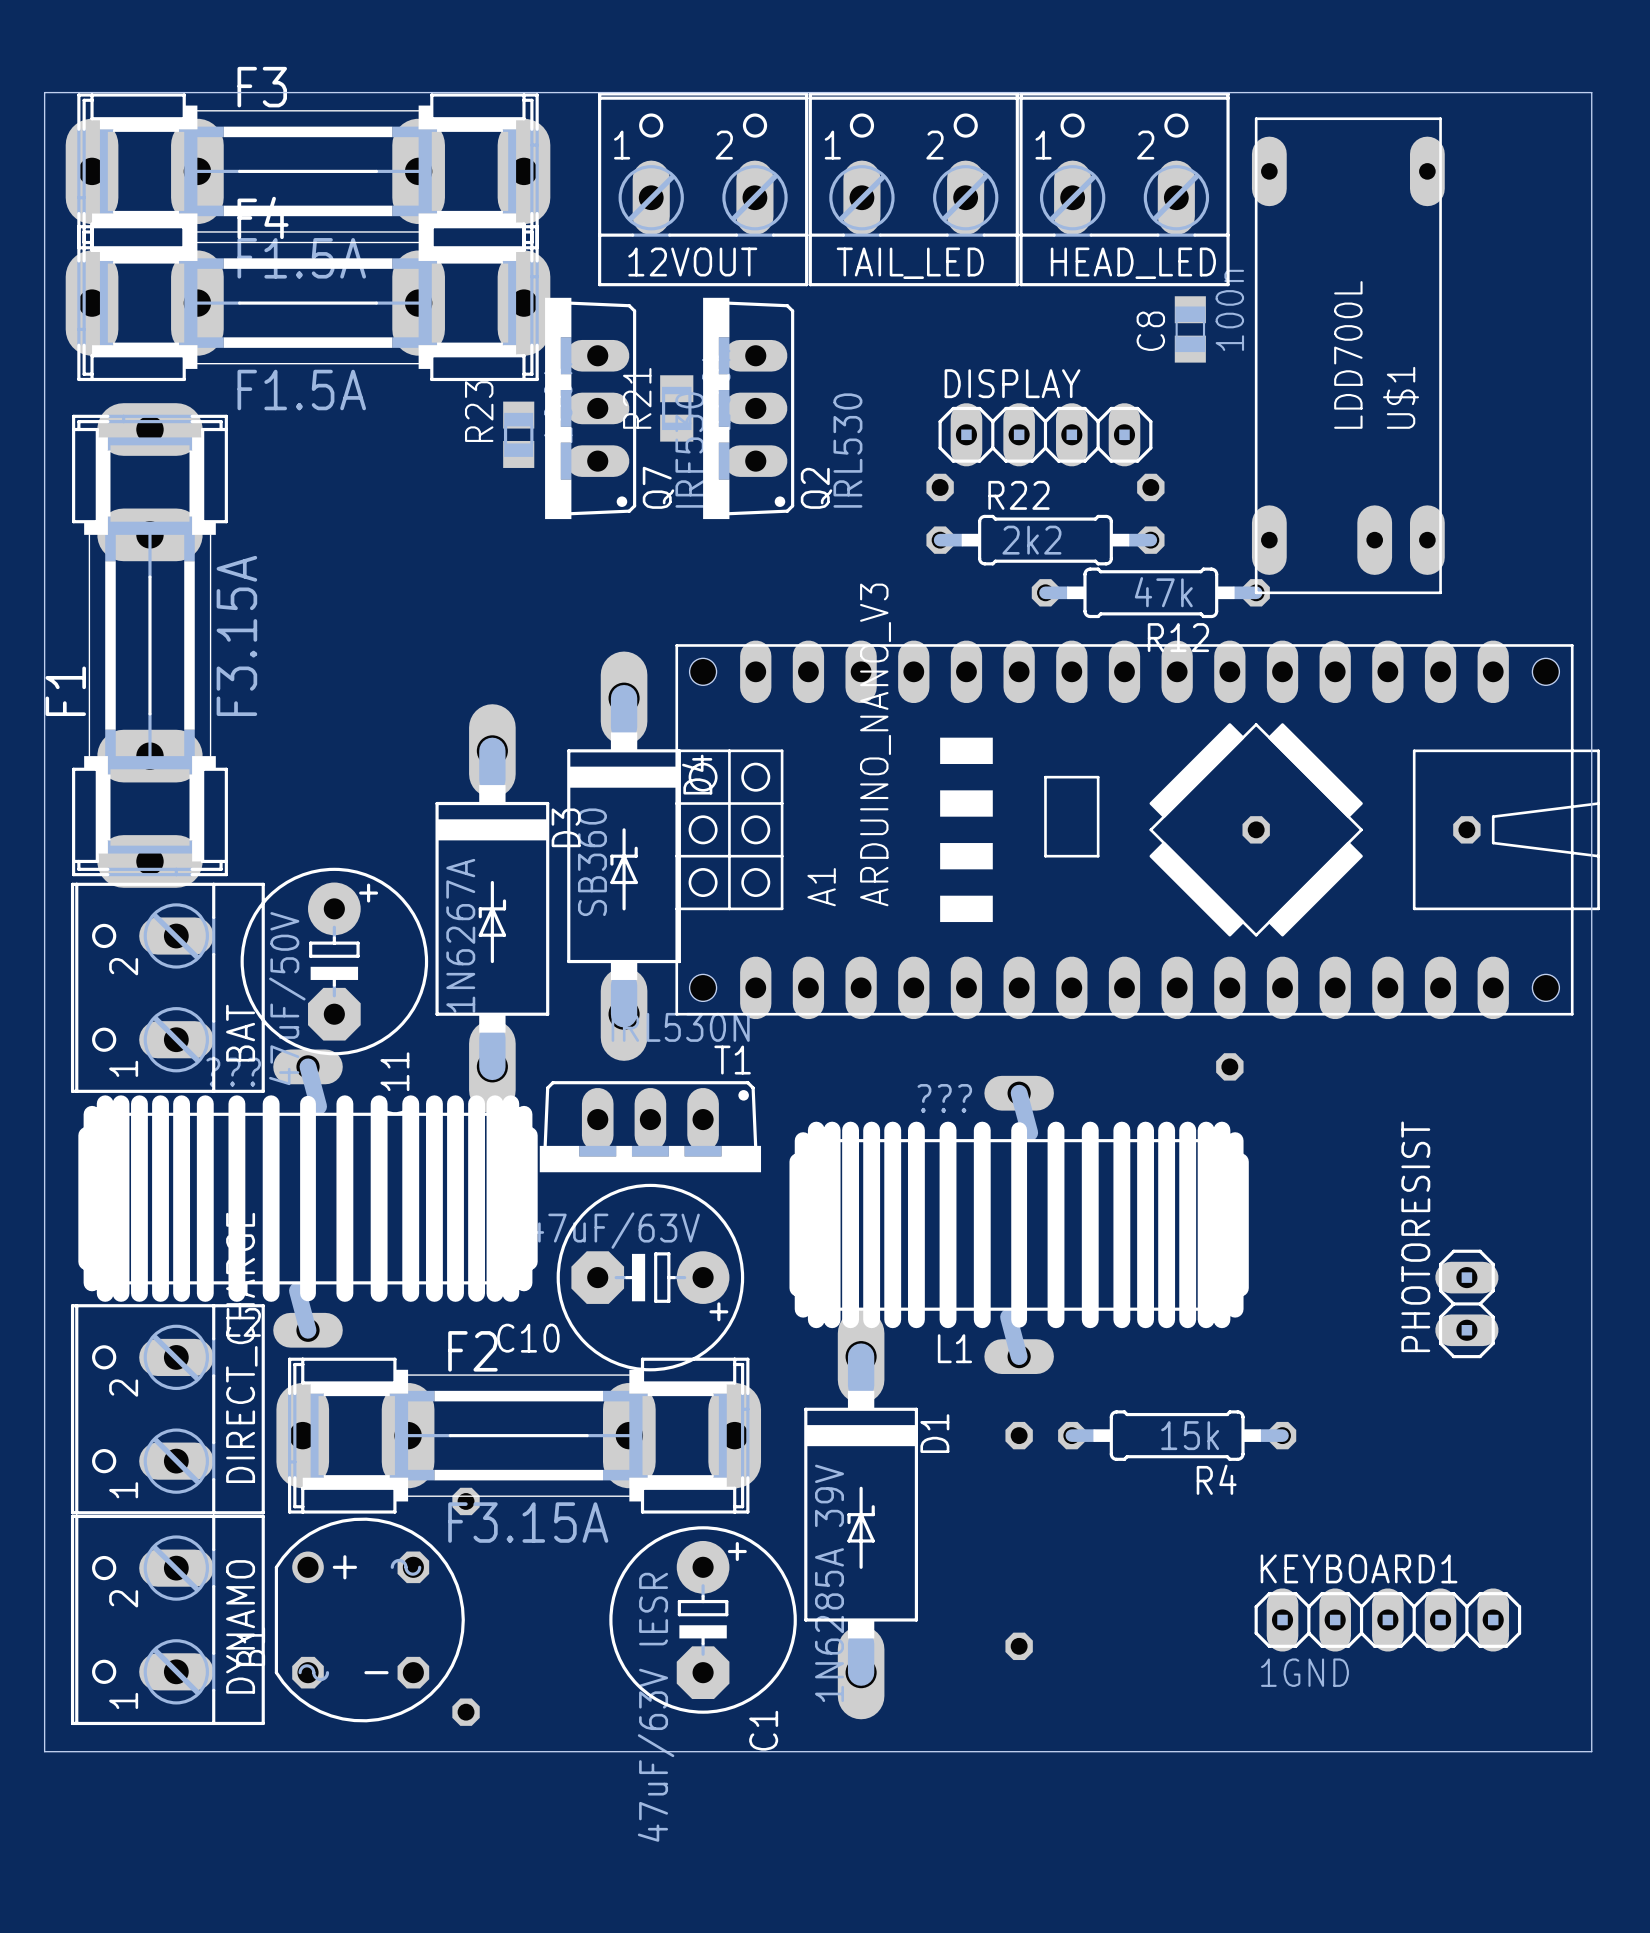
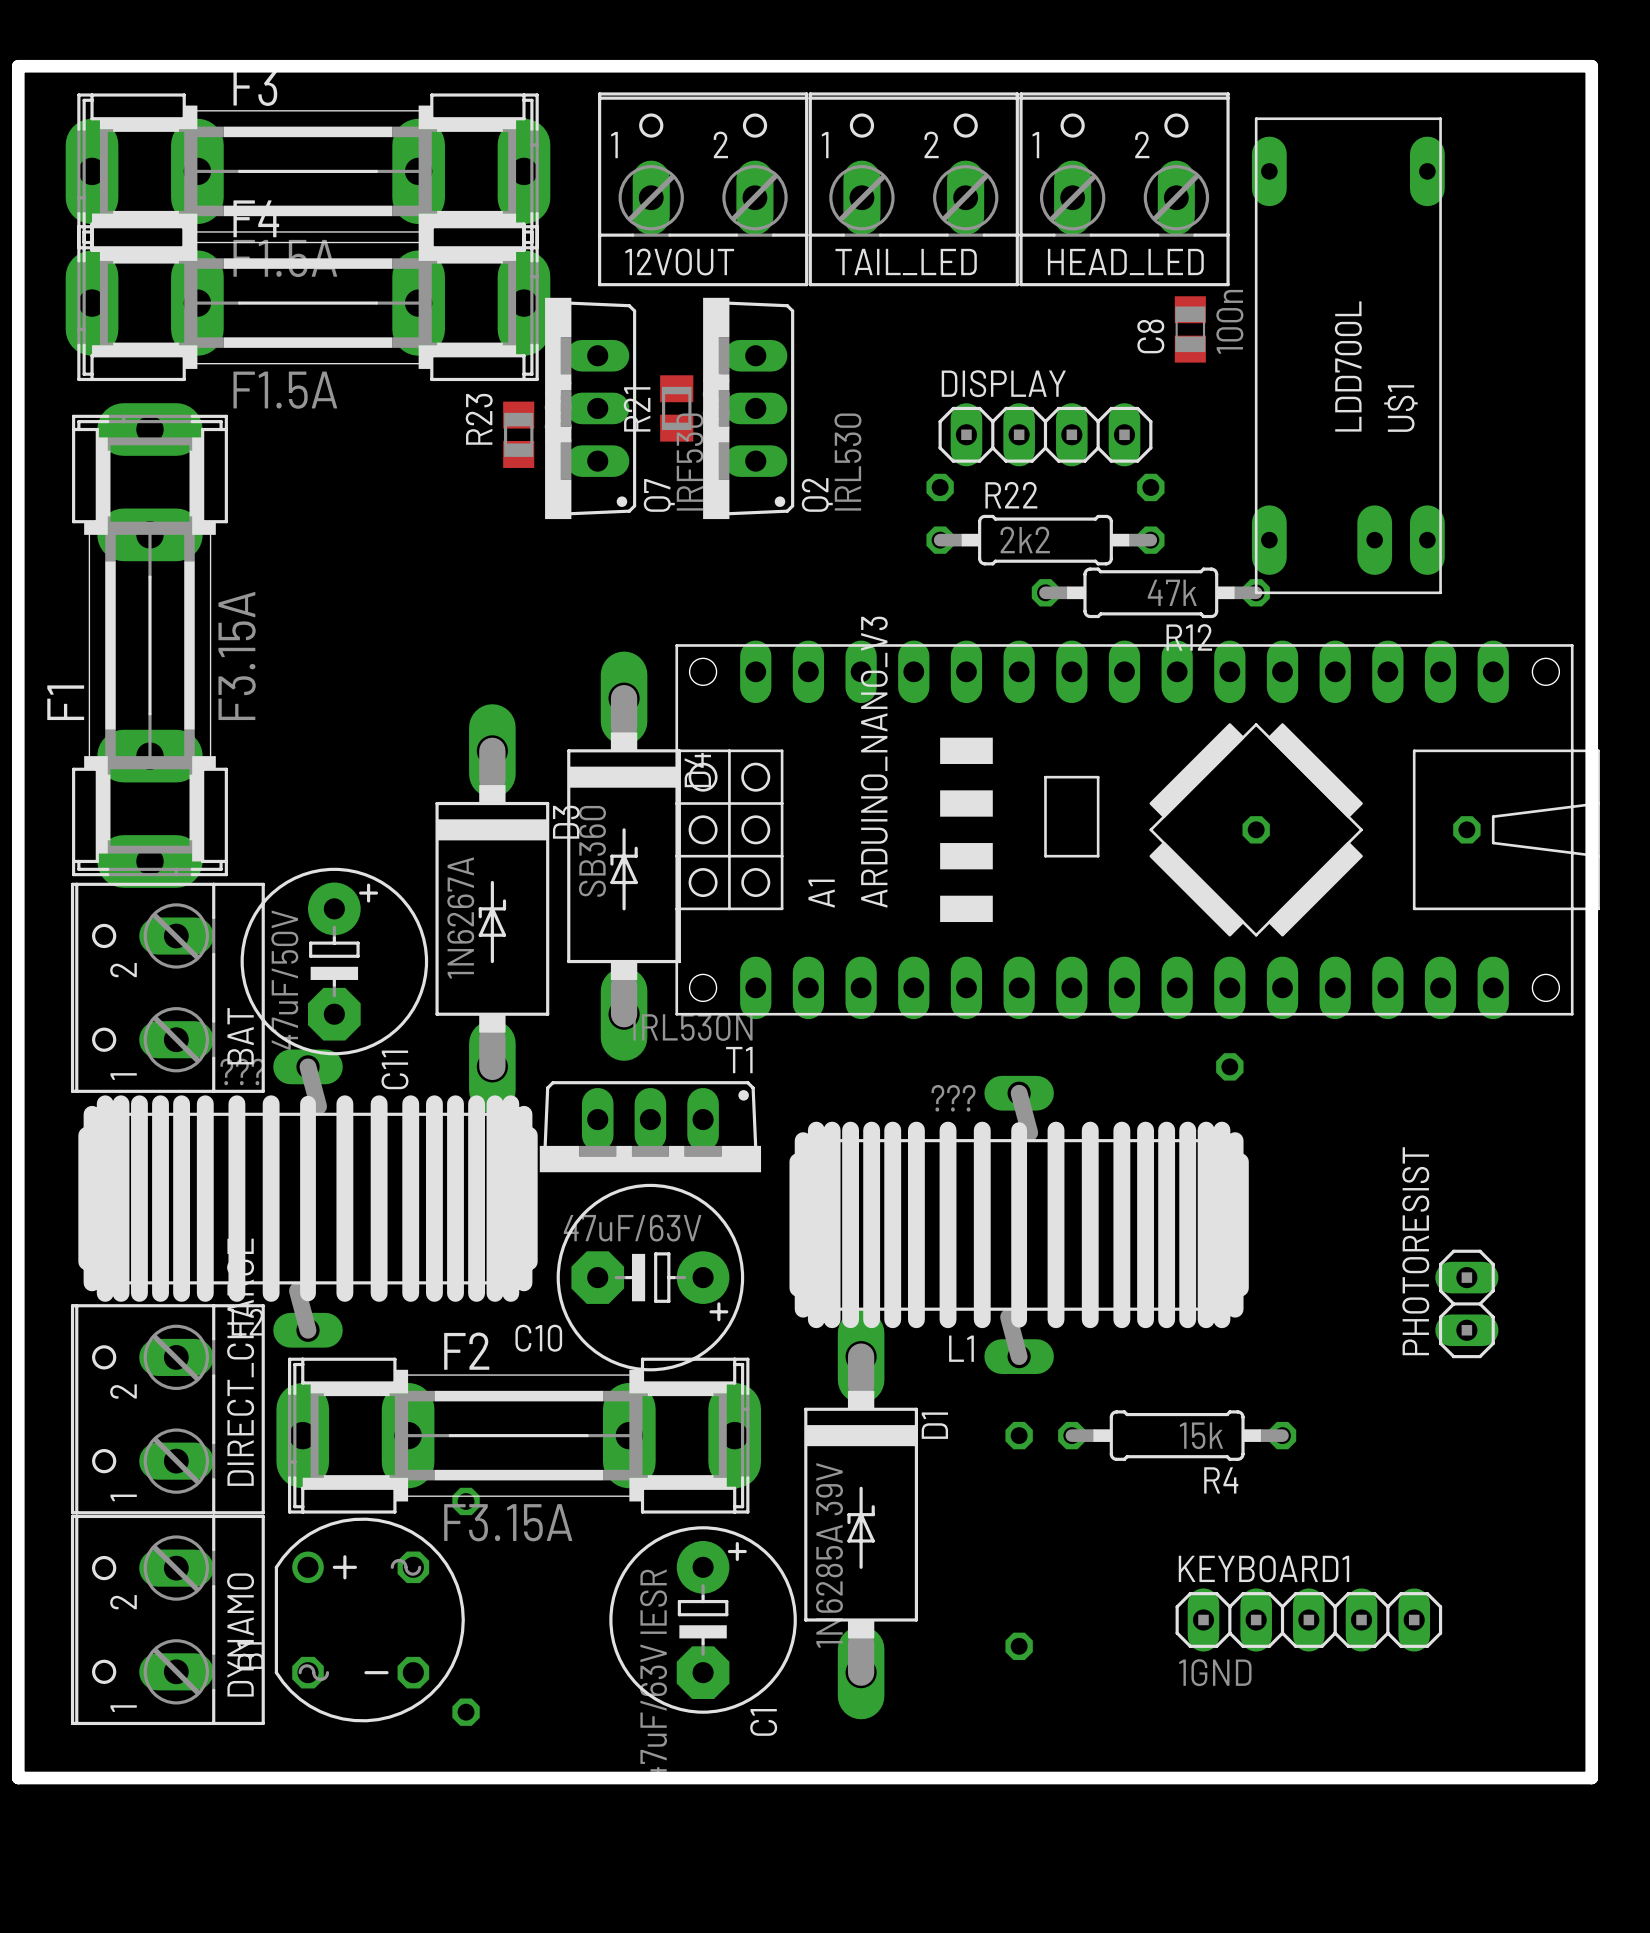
board edge: (1591, 92) (44, 92) (44, 1751) (1591, 1751) -> (1591, 92) (1591, 66) (18, 66) (18, 1778) (1591, 1778) (1591, 1751)
board edge width: thin (1591, 92) (1591, 1751) -> thick (1591, 92) (1591, 1751)
KEYBOARD1 position: (1387, 1619) -> (1308, 1619)

